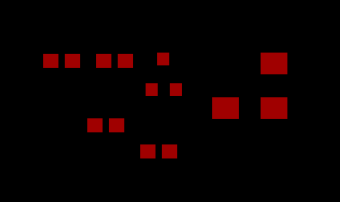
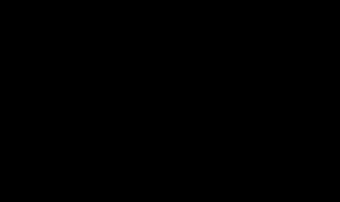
part: (61, 60) -> none
part: (114, 60) -> none
part: (163, 74) -> none
part: (249, 85) -> none
part: (105, 125) -> none
part: (158, 151) -> none

